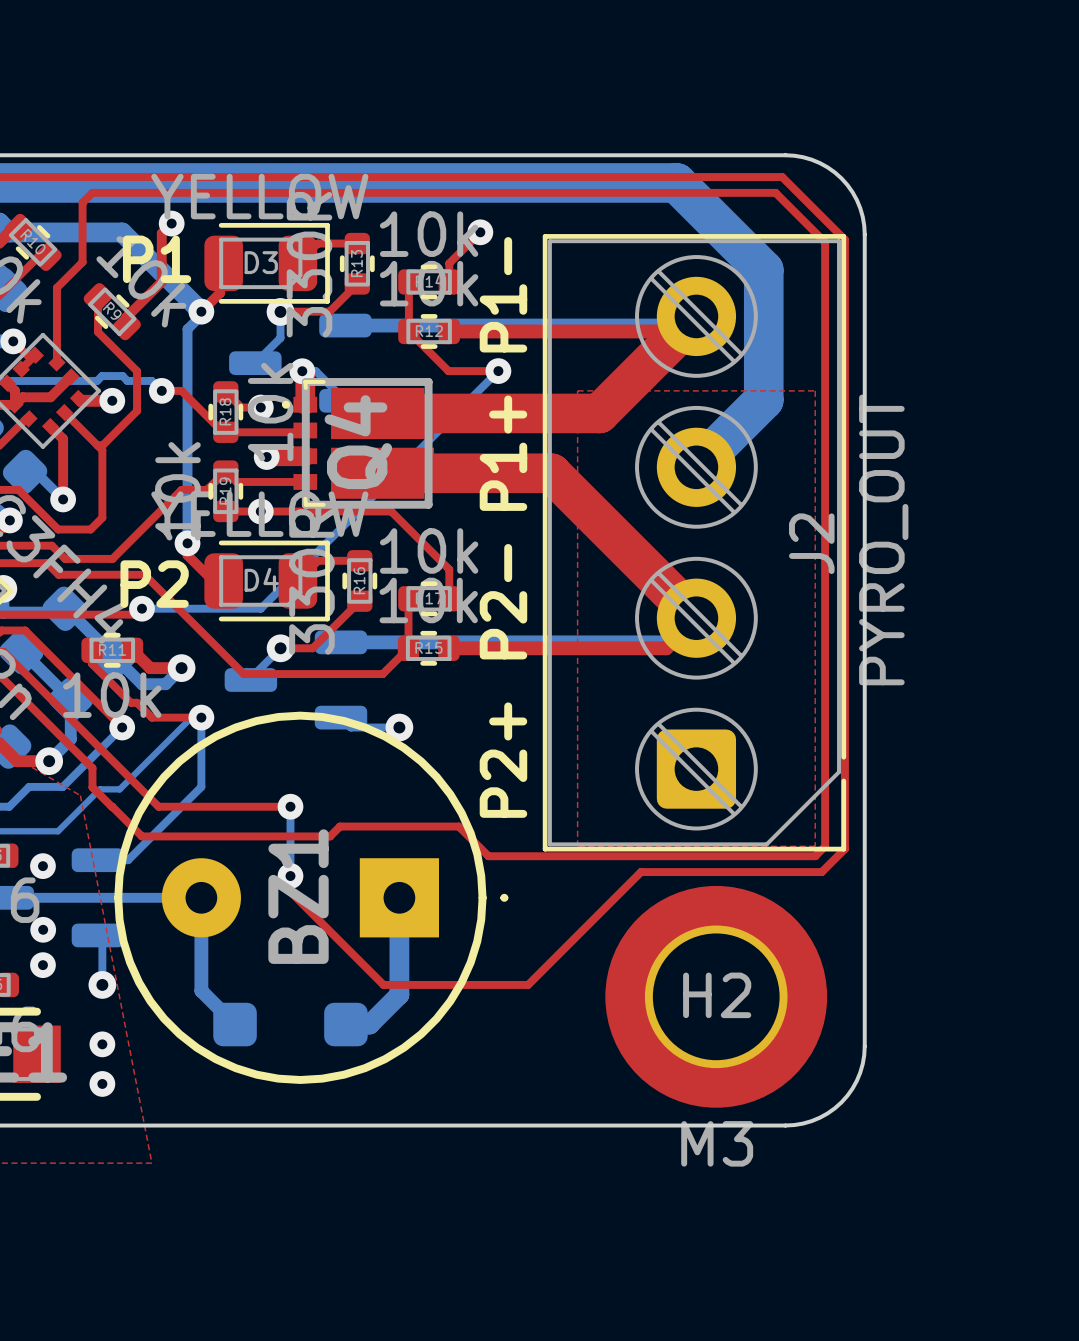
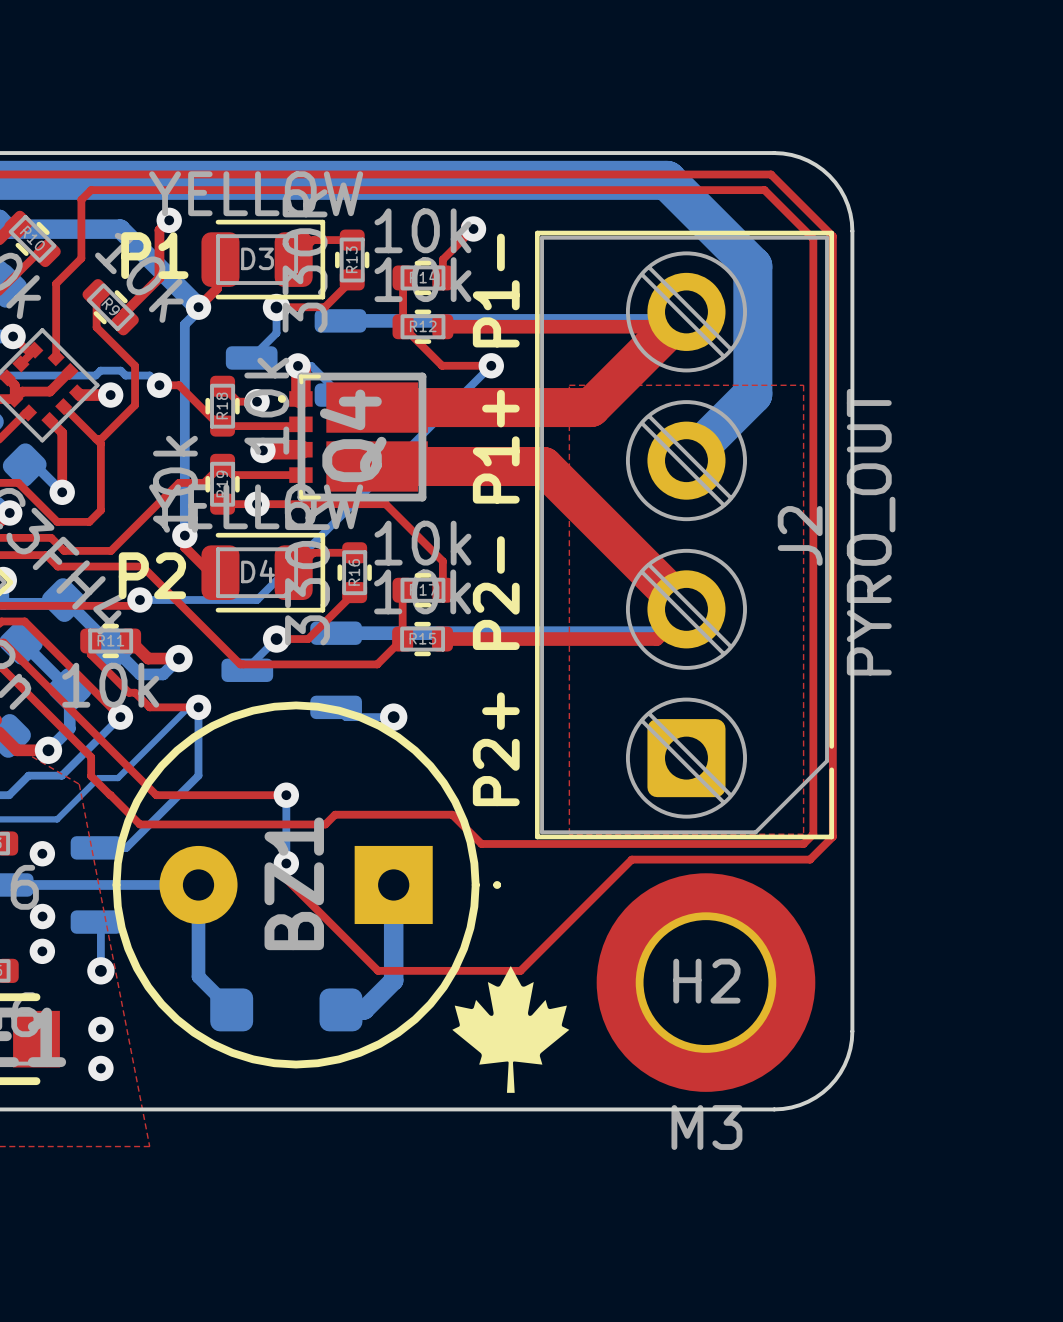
drawing: none -> [452, 966, 570, 1093]

